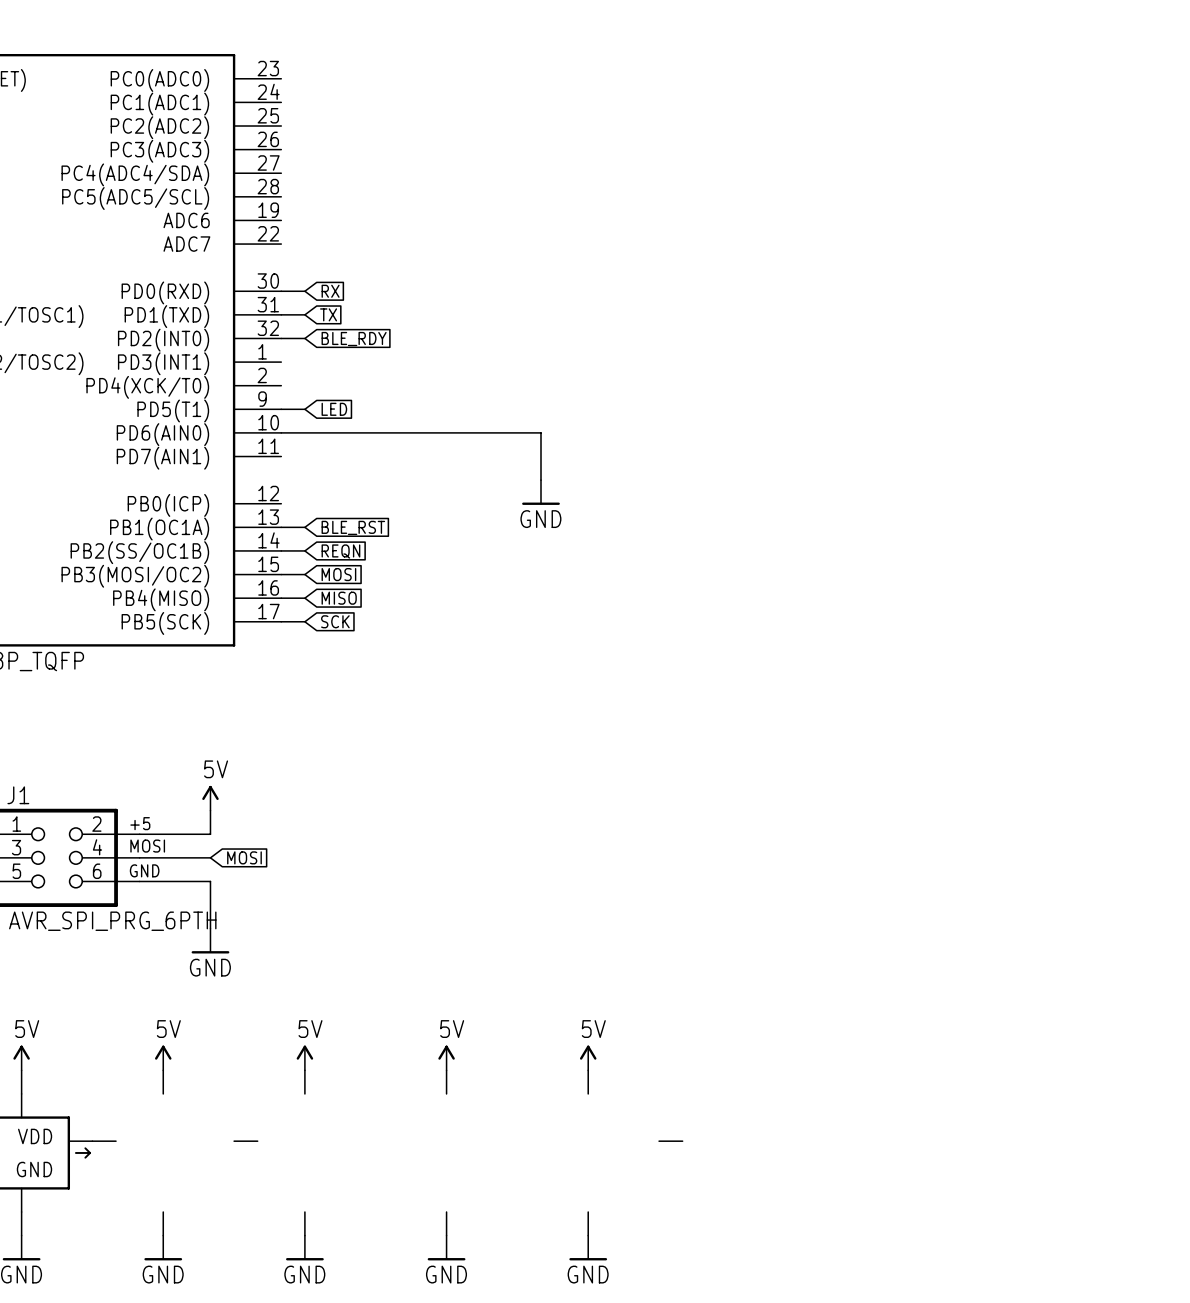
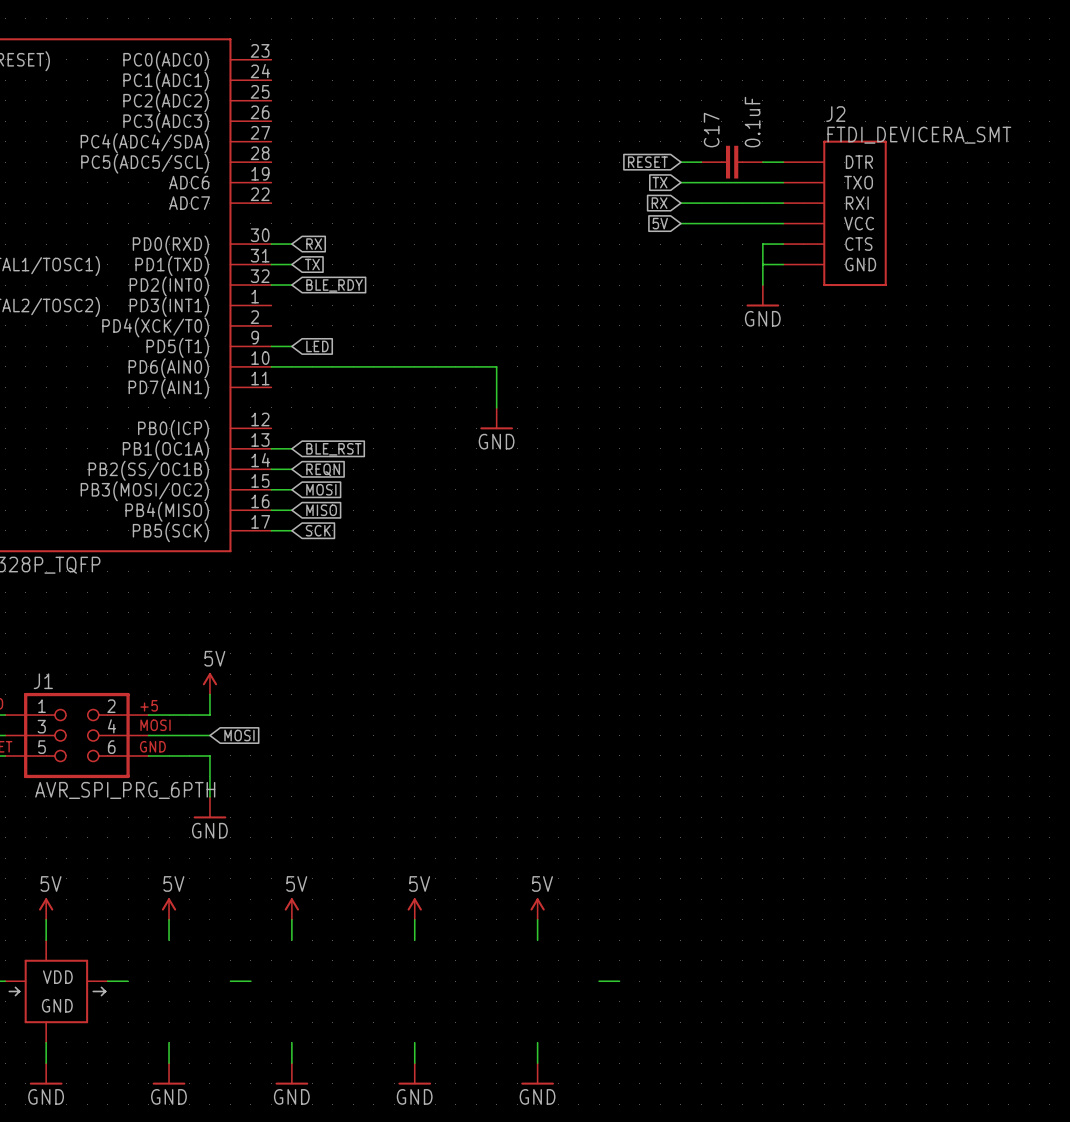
global label: none -> RESET (647, 162)
wire: none -> (680, 162) (701, 162)
C17: none -> 0.1uF (732, 162)
wire: none -> (762, 162) (783, 162)
global label: none -> TX (660, 182)
wire: none -> (680, 182) (783, 182)
global label: none -> RX (659, 203)
wire: none -> (680, 203) (783, 203)
J2: none -> FTDI_DEVICERA_SMT (835, 213)
global label: none -> 5V (660, 223)
wire: none -> (680, 223) (783, 223)
wire: none -> (783, 244) (762, 244) (762, 285)
wire: none -> (762, 264) (783, 264)
power symbol: none -> GND (762, 295)

